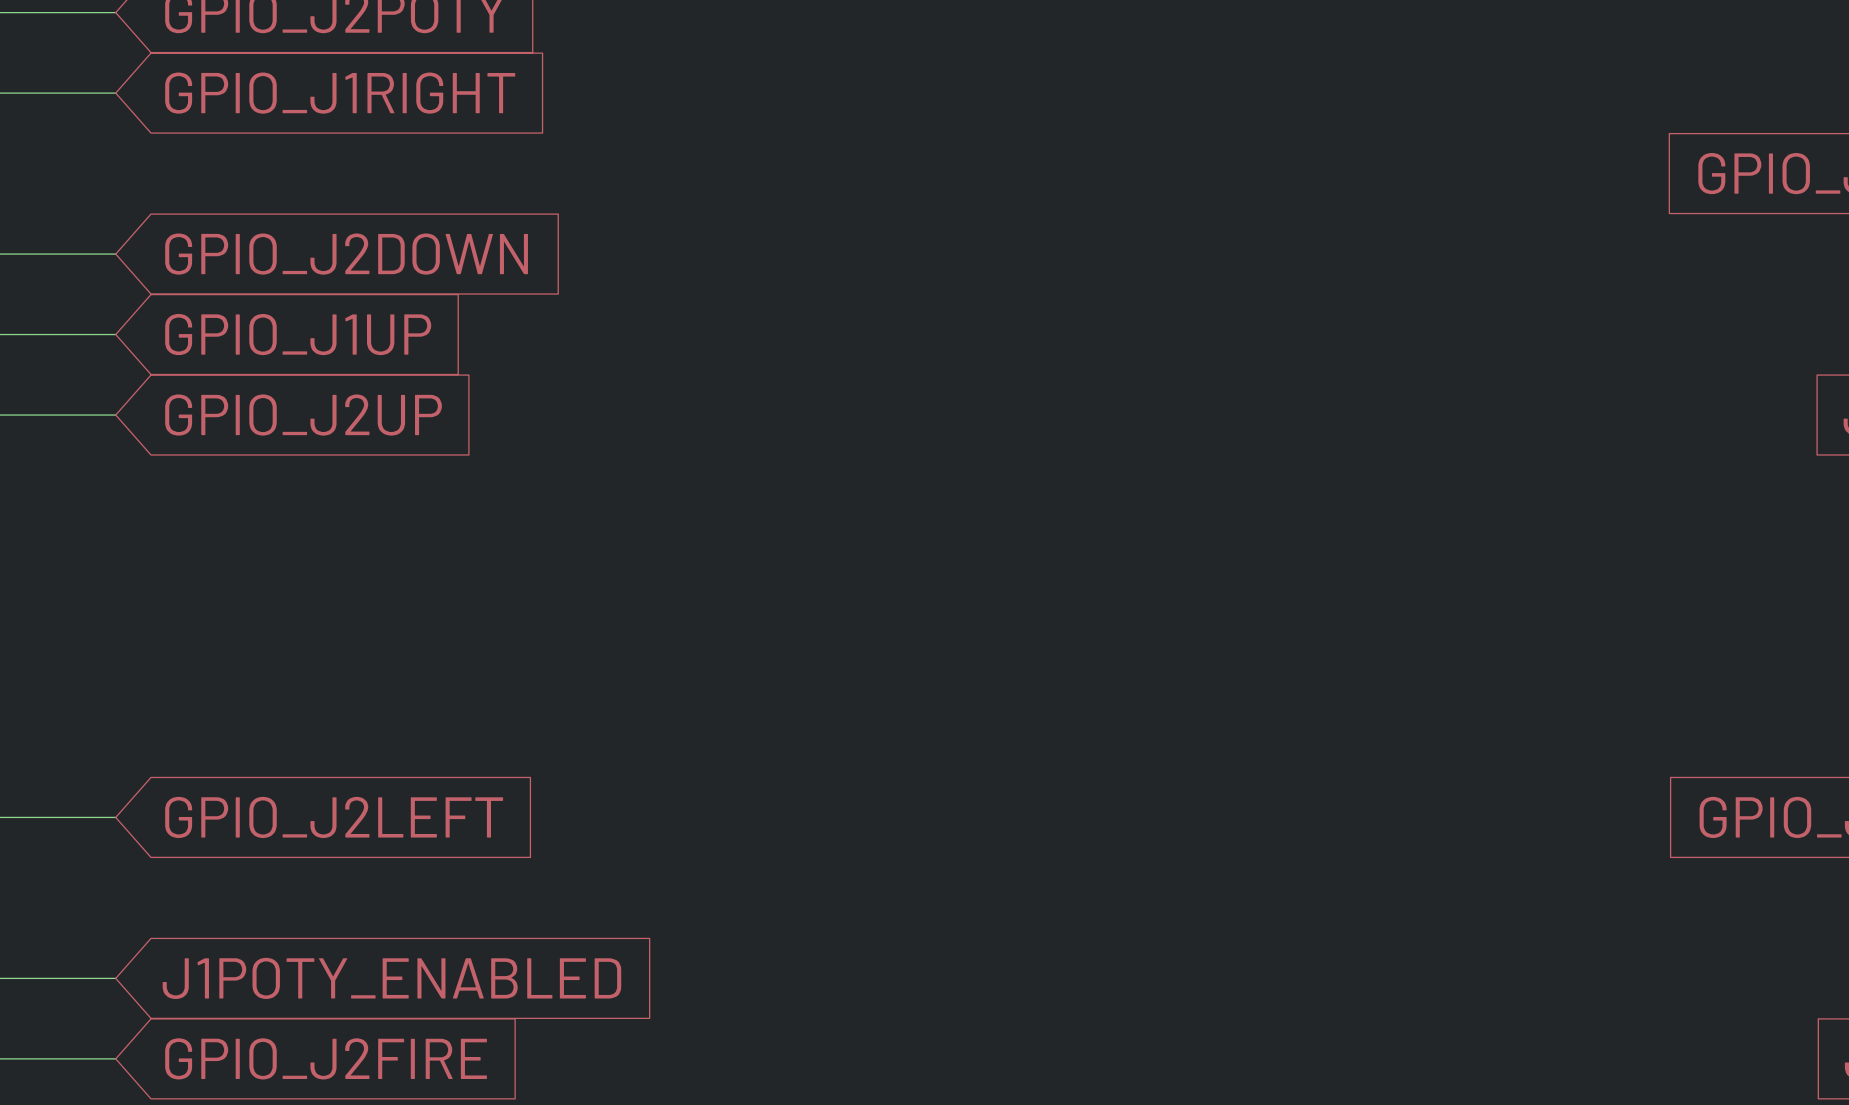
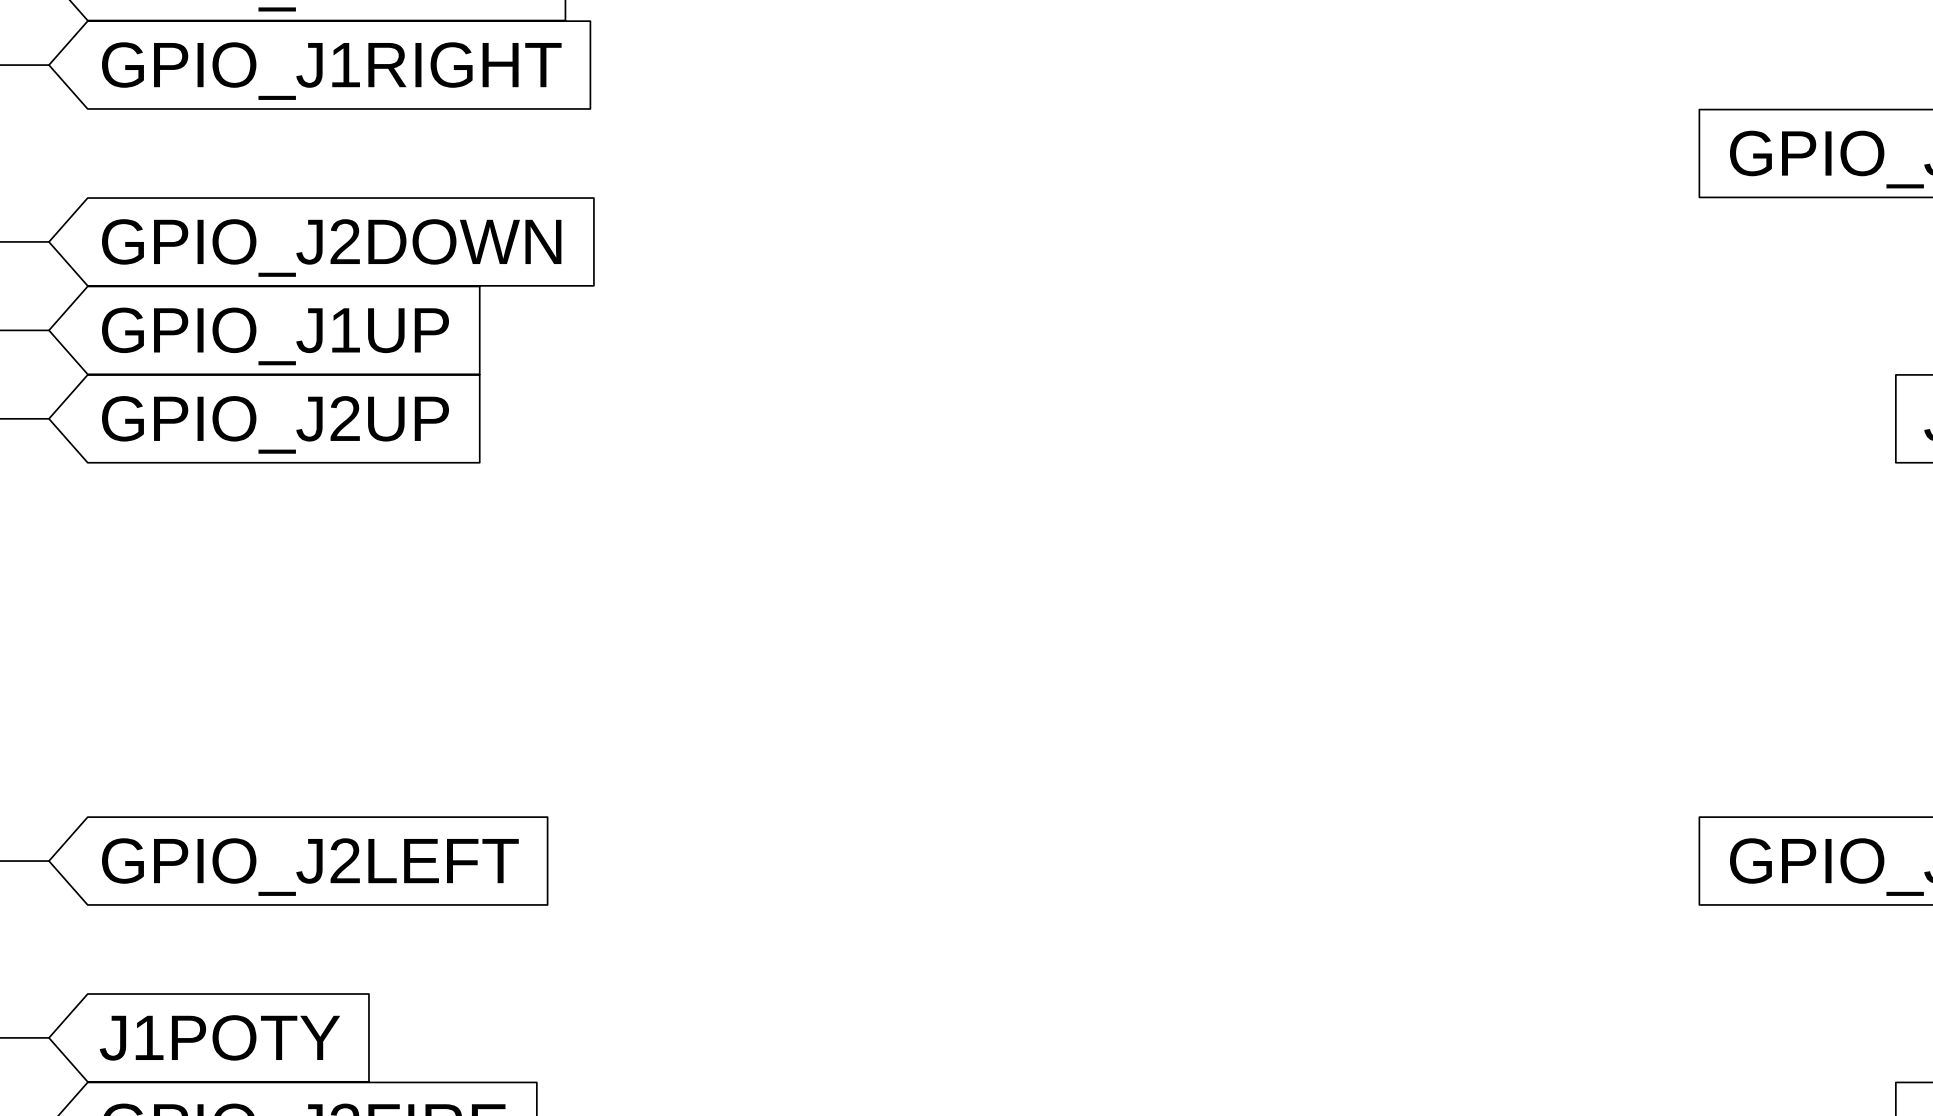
global label: J1POTY_ENABLED (391, 978) -> J1POTY (219, 1037)

